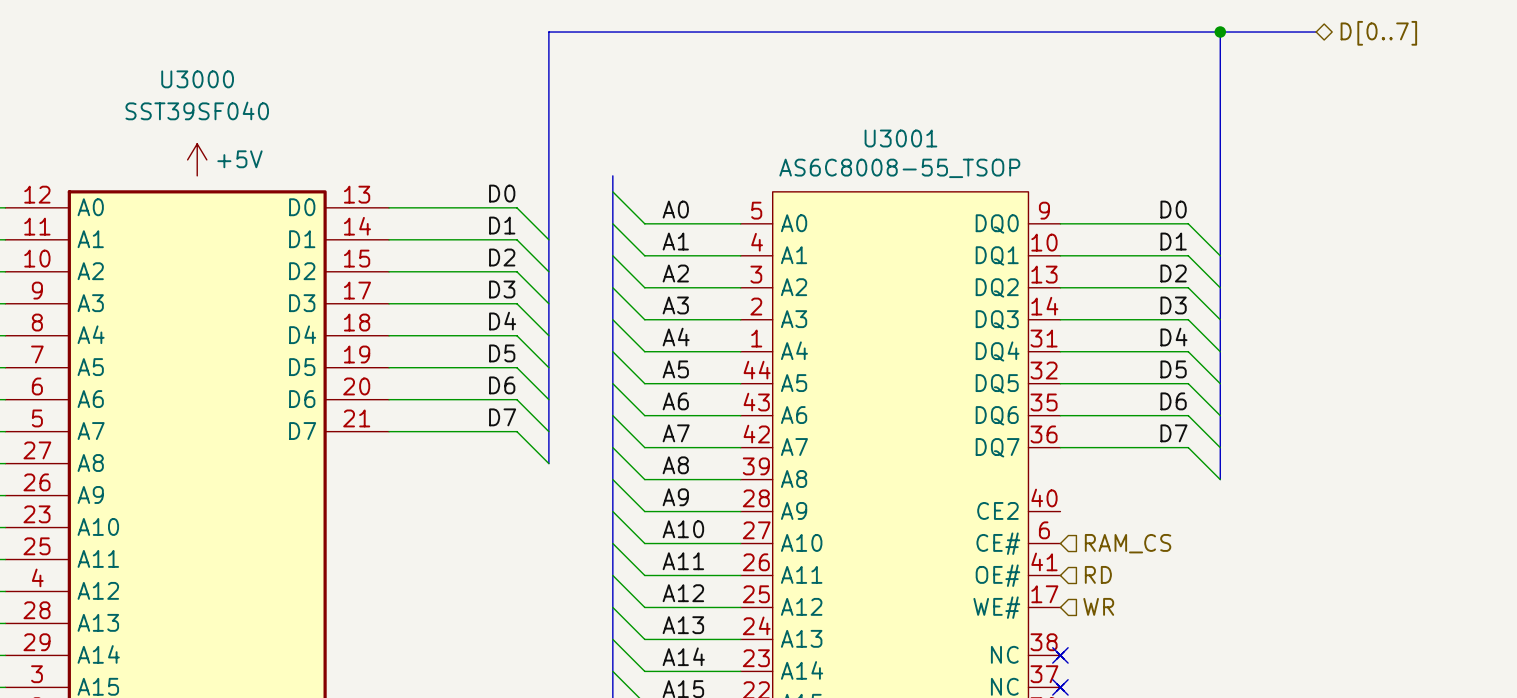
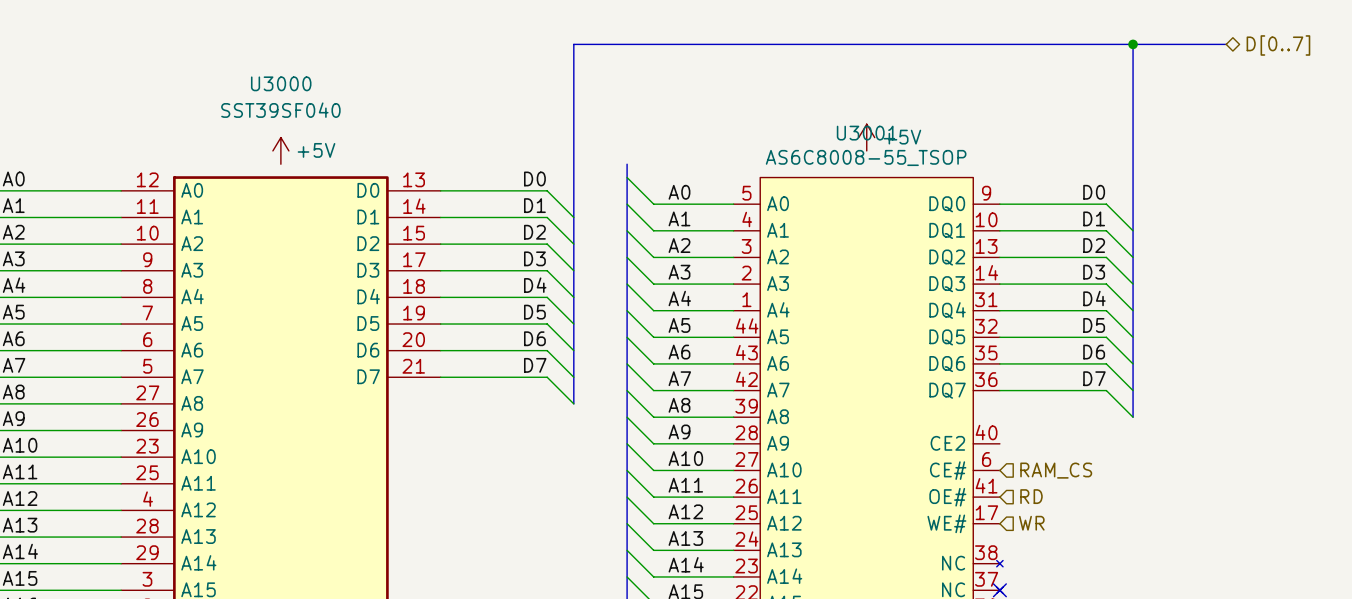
bus: none -> (1212, 44) (1226, 44)
hierarchical label position: D[0..7] (1378, 33) -> D[0..7] (1278, 45)
power symbol: none -> +5V (866, 137)
no-connect mark: (1060, 655) -> none

